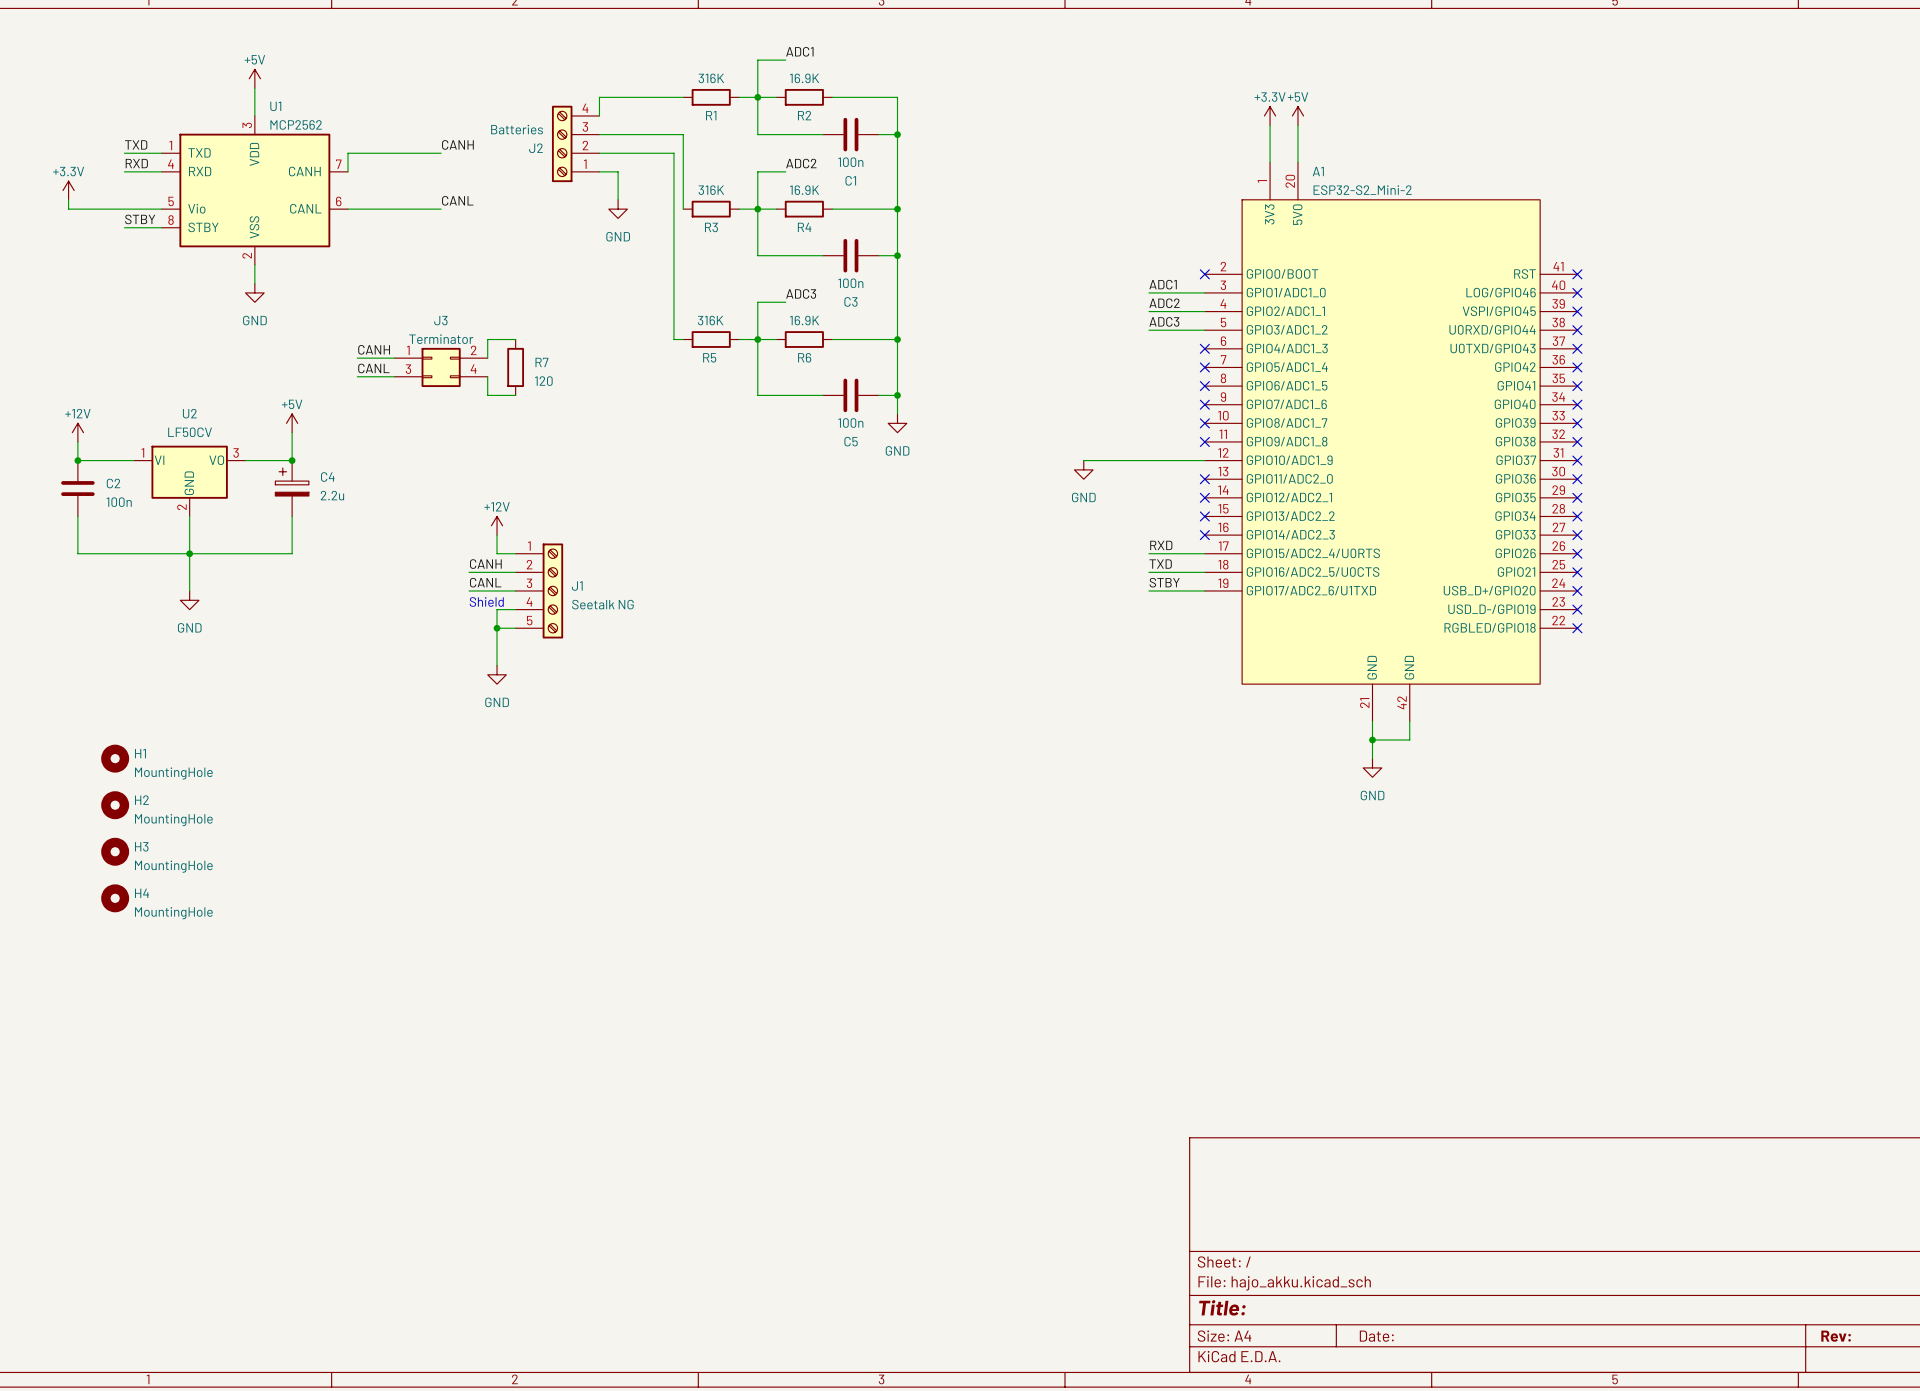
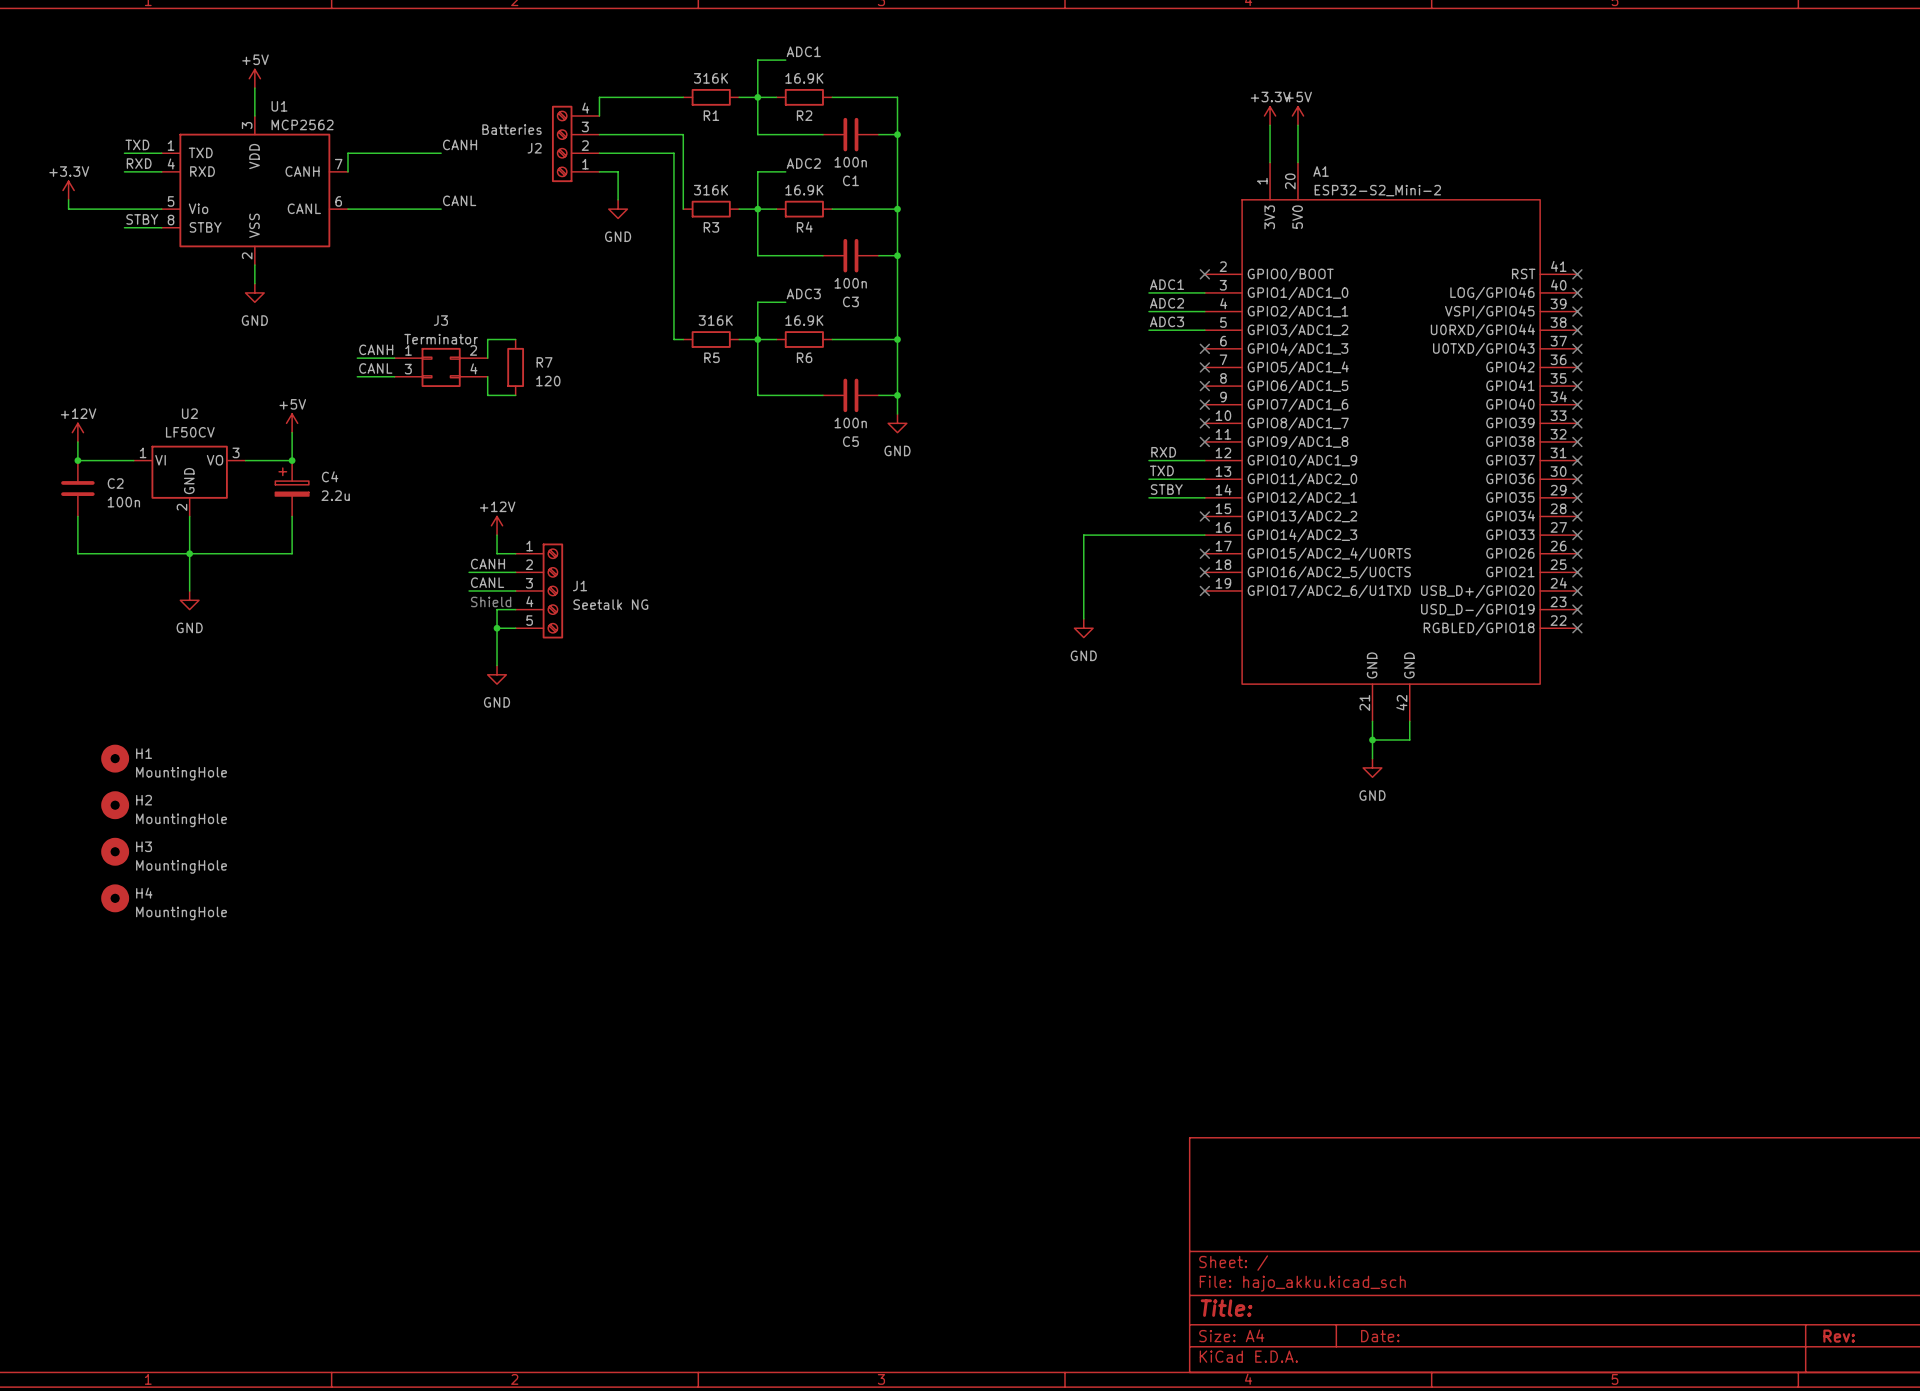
wire: (1083, 460) (1148, 460) -> none
power symbol position: GND (1083, 469) -> GND (1083, 628)
no-connect mark: (1204, 479) -> none
no-connect mark: (1204, 497) -> none
wire: none -> (1204, 535) (1083, 535) (1083, 618)
no-connect mark: (1204, 535) -> none
label position: RXD (1161, 545) -> RXD (1163, 452)
wire: (1148, 553) (1204, 553) -> (1148, 479) (1204, 479)
no-connect mark: none -> (1204, 553)
label position: TXD (1160, 564) -> TXD (1161, 470)
wire: (1148, 572) (1204, 572) -> (1148, 497) (1204, 497)
no-connect mark: none -> (1204, 572)
label position: STBY (1164, 582) -> STBY (1166, 489)
wire: (1148, 590) (1204, 590) -> none
no-connect mark: none -> (1204, 590)

